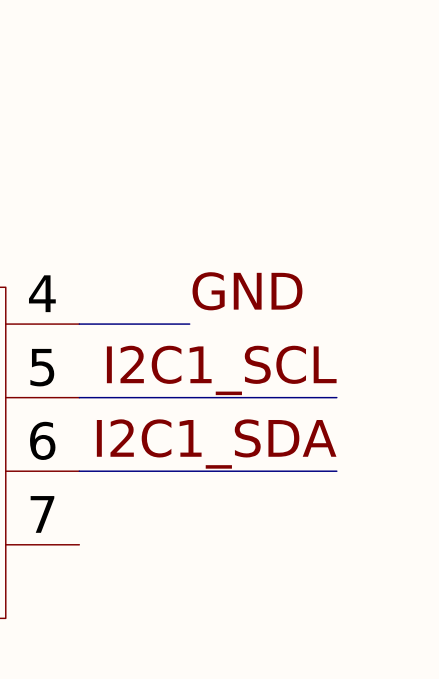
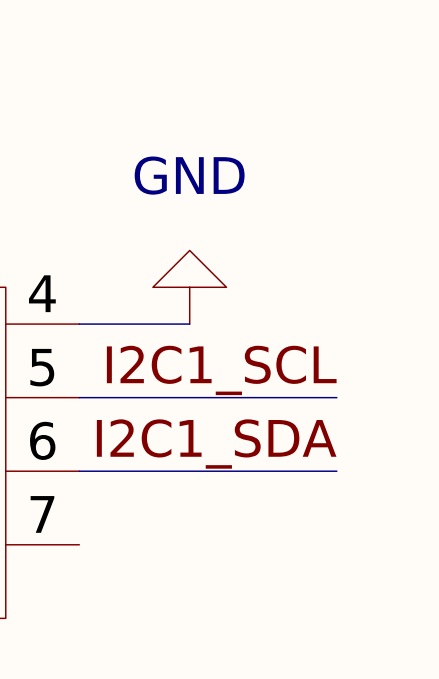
power symbol: none -> GND (189, 287)
label: GND (247, 291) -> none

